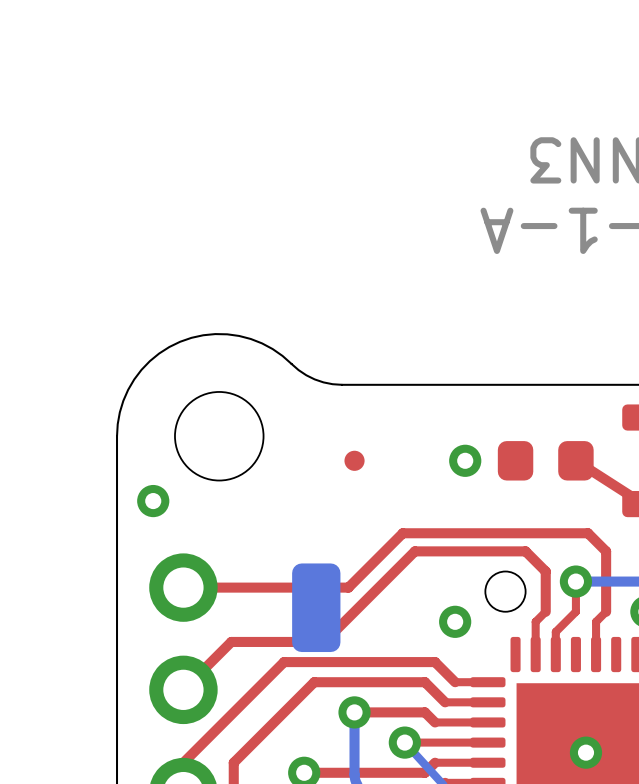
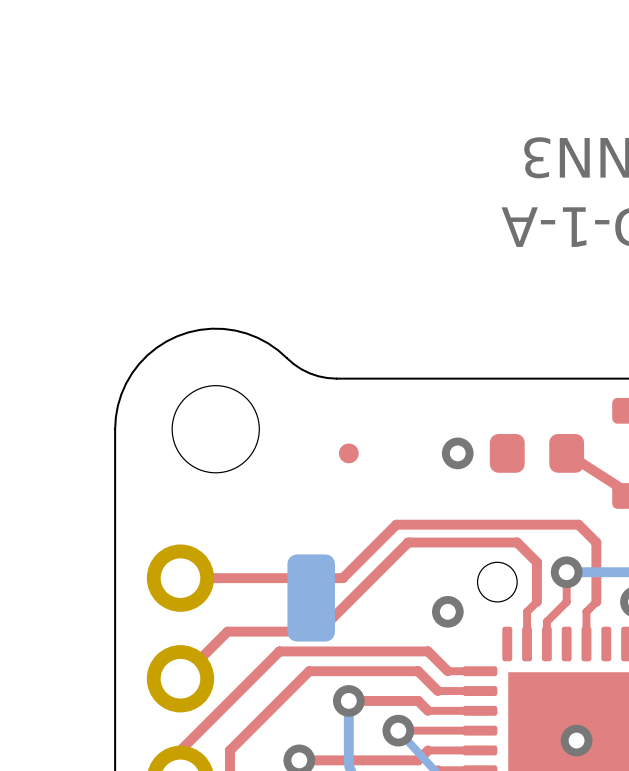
via: (153, 501) -> none

